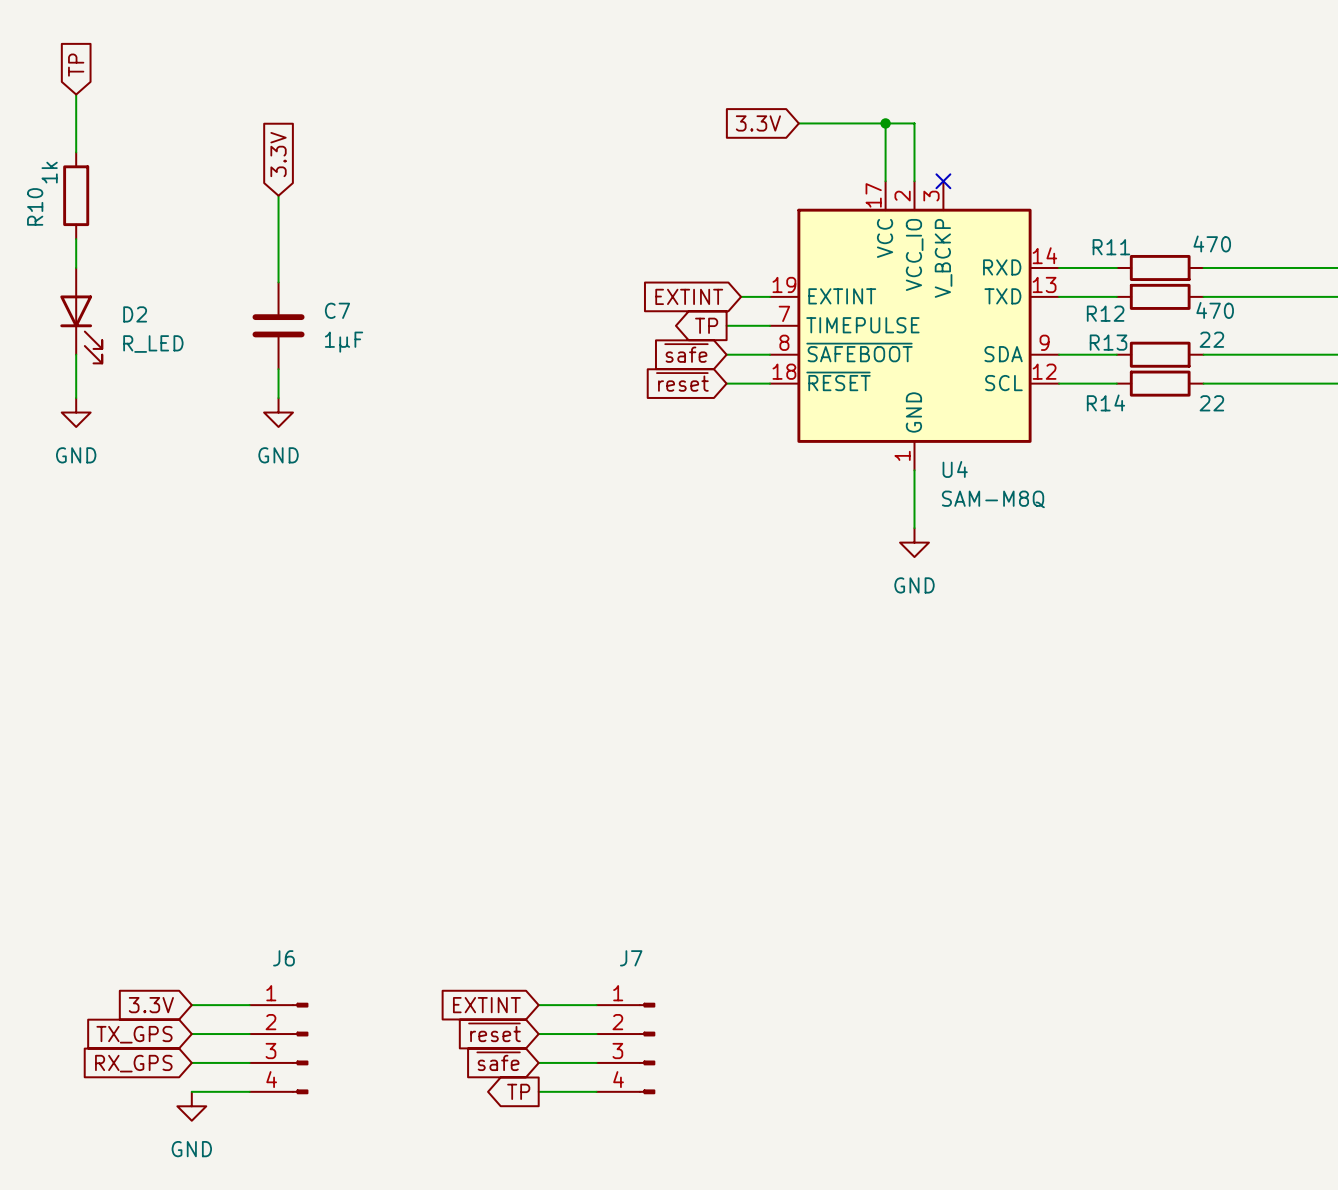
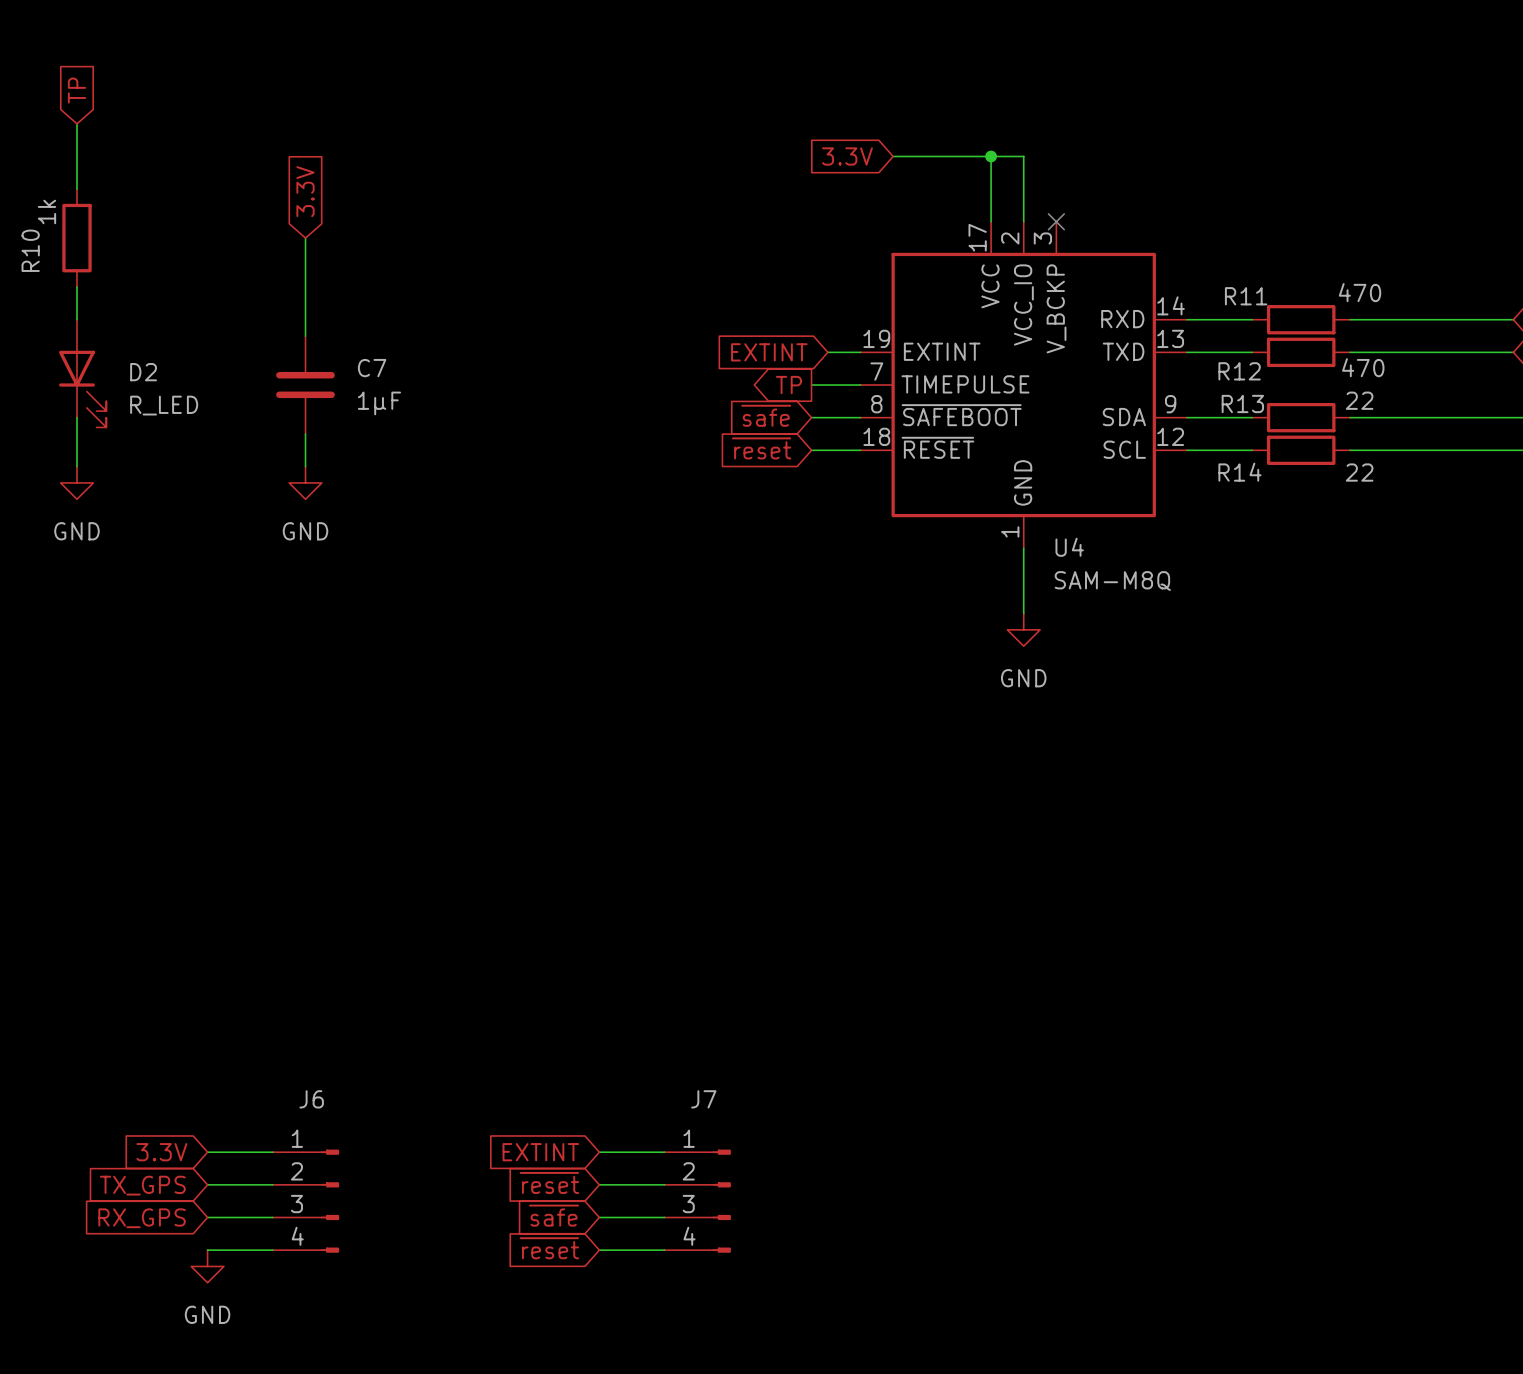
global label shape: output (518, 1091) -> input (549, 1248)
global label: TP (518, 1091) -> ~{reset} (549, 1248)

